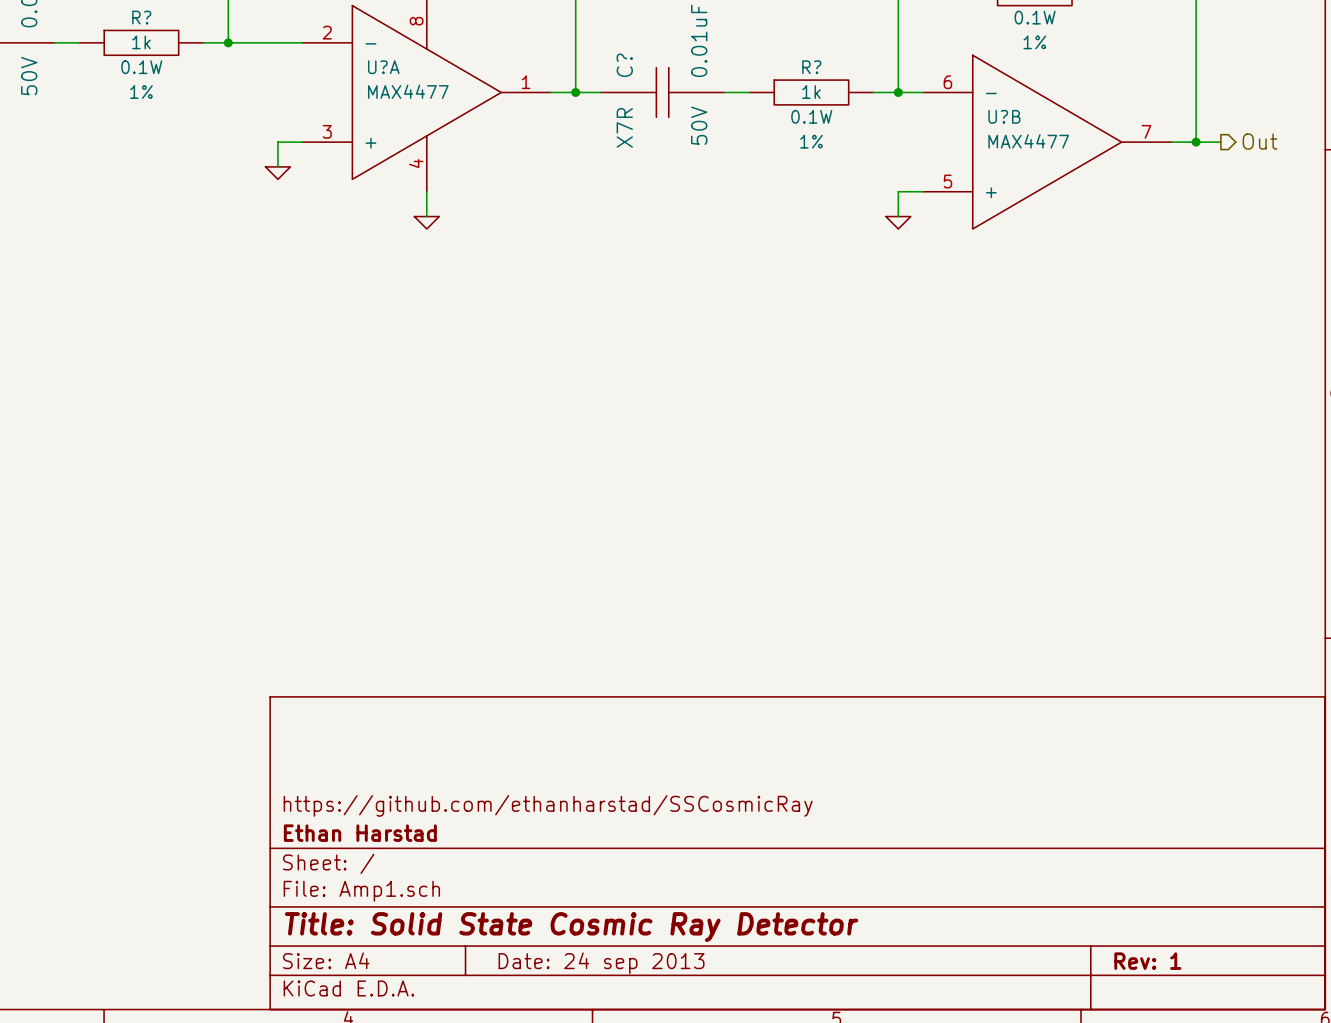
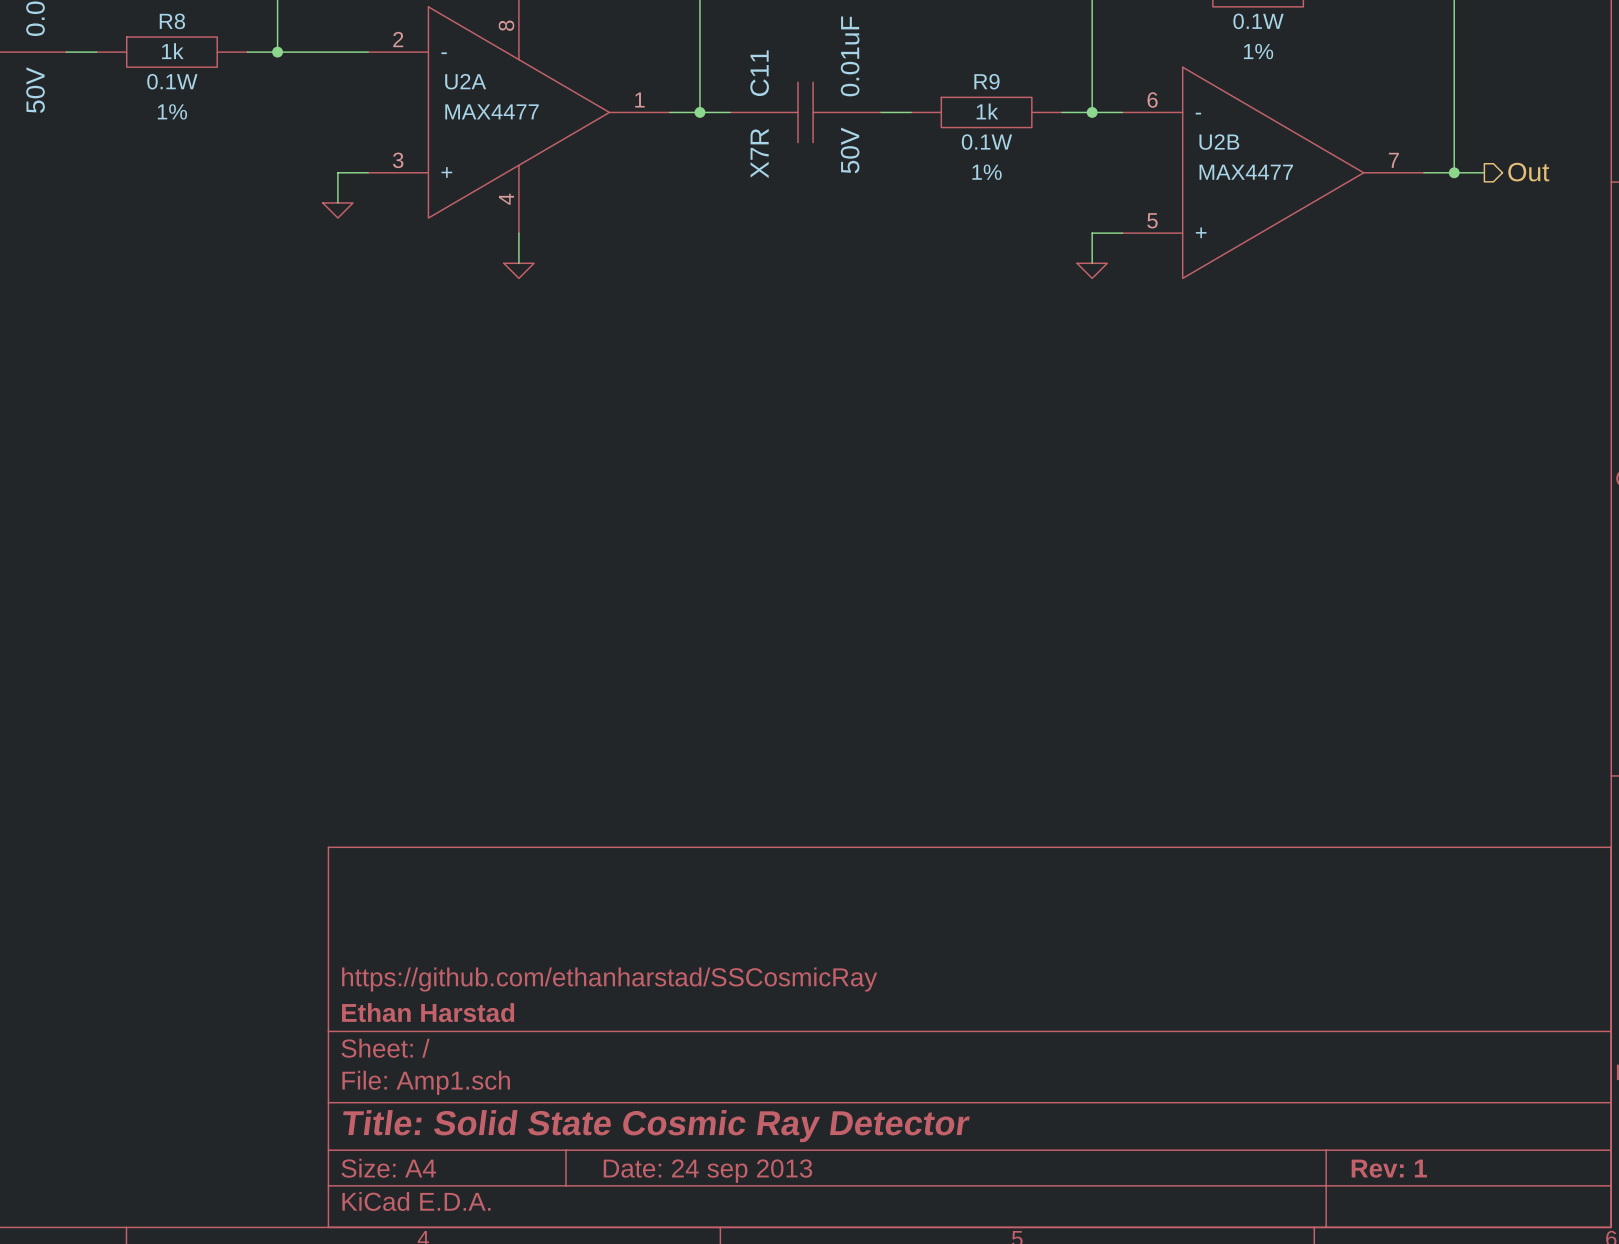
R? name: R? (141, 17) -> R8 (172, 21)
C? name: C? (624, 65) -> C11 (759, 73)
U?A name: U?A (383, 67) -> U2A (465, 81)
R? name: R? (811, 67) -> R9 (986, 81)
U?B name: U?B (1004, 116) -> U2B (1219, 142)

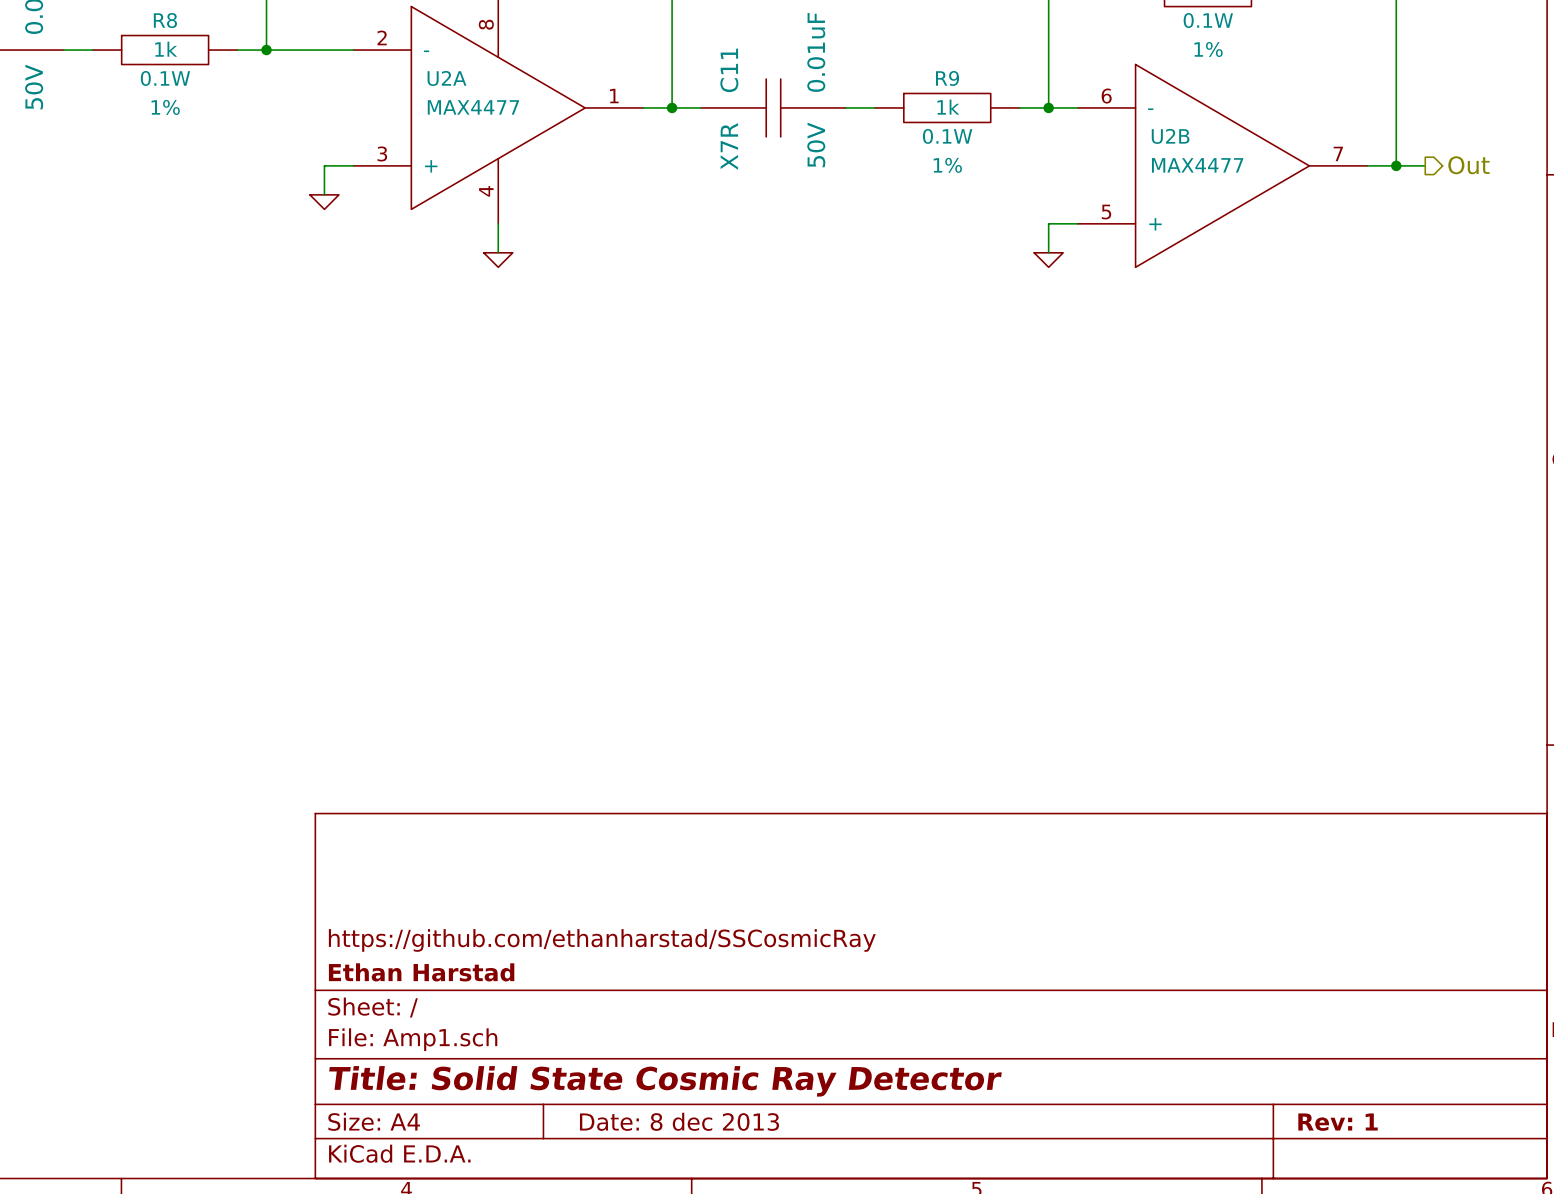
title block: Date: 24 sep 2013 (707, 1171) -> Date: 8 dec 2013 (679, 1121)

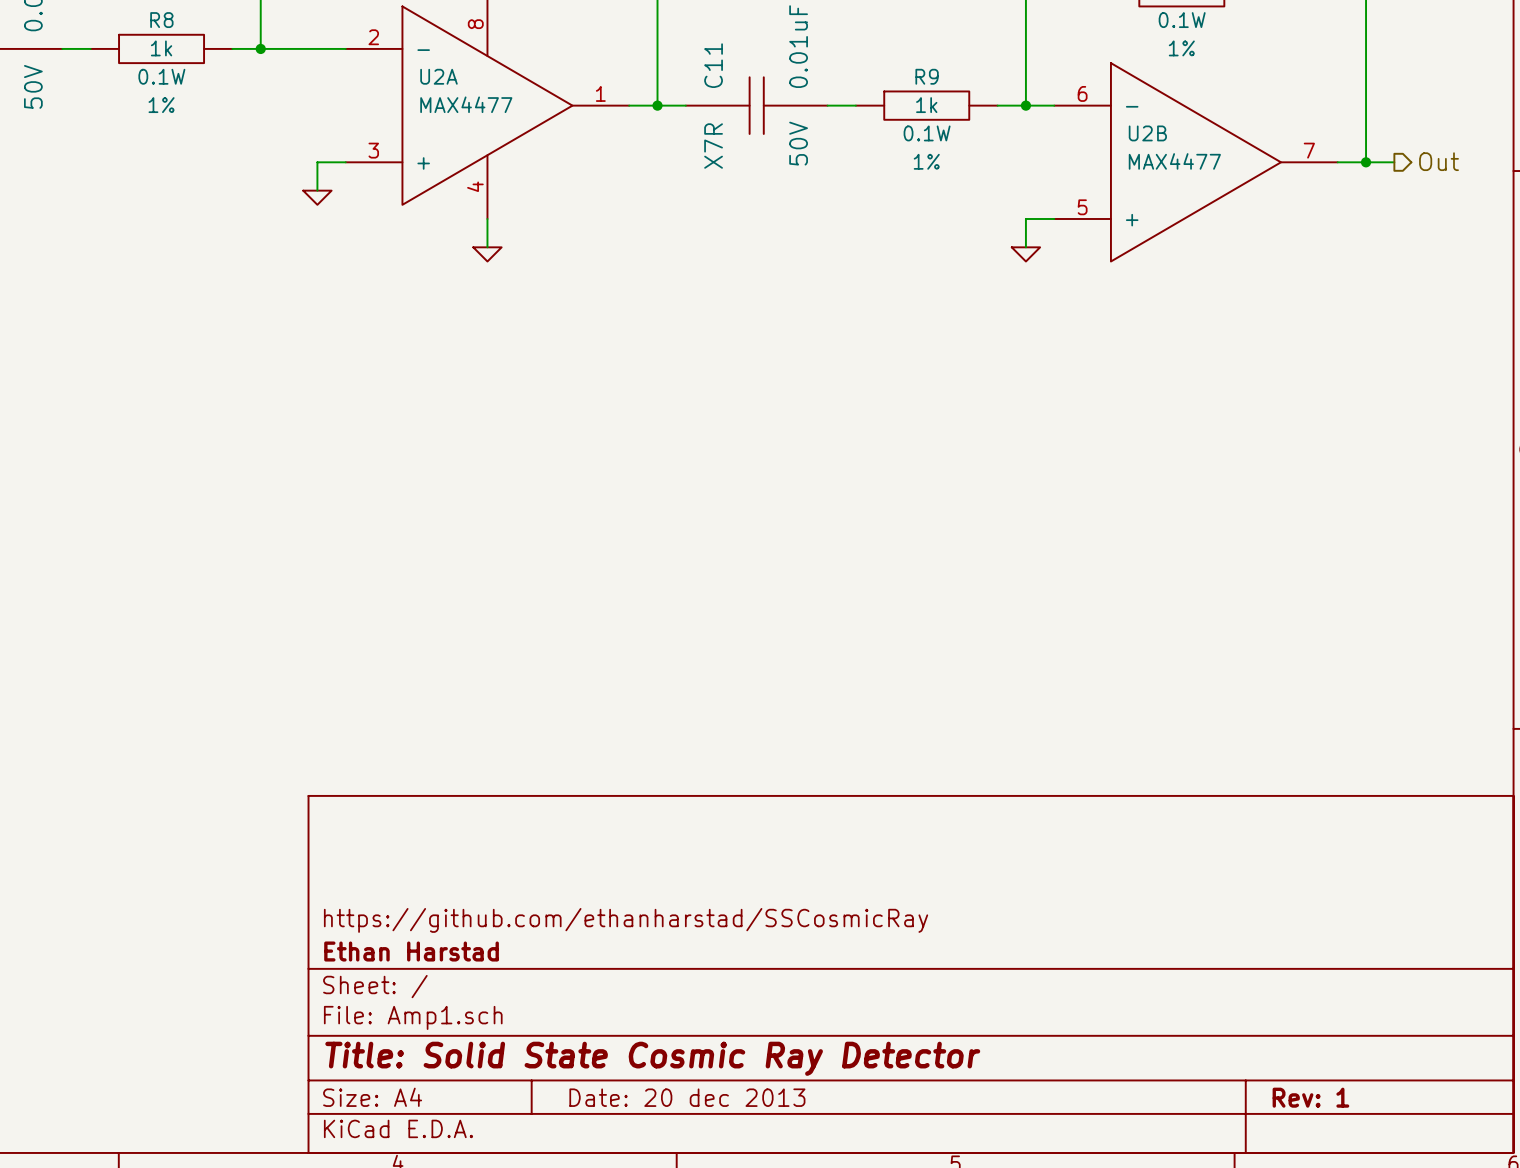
title block: Date: 8 dec 2013 (679, 1121) -> Date: 20 dec 2013 (687, 1097)

